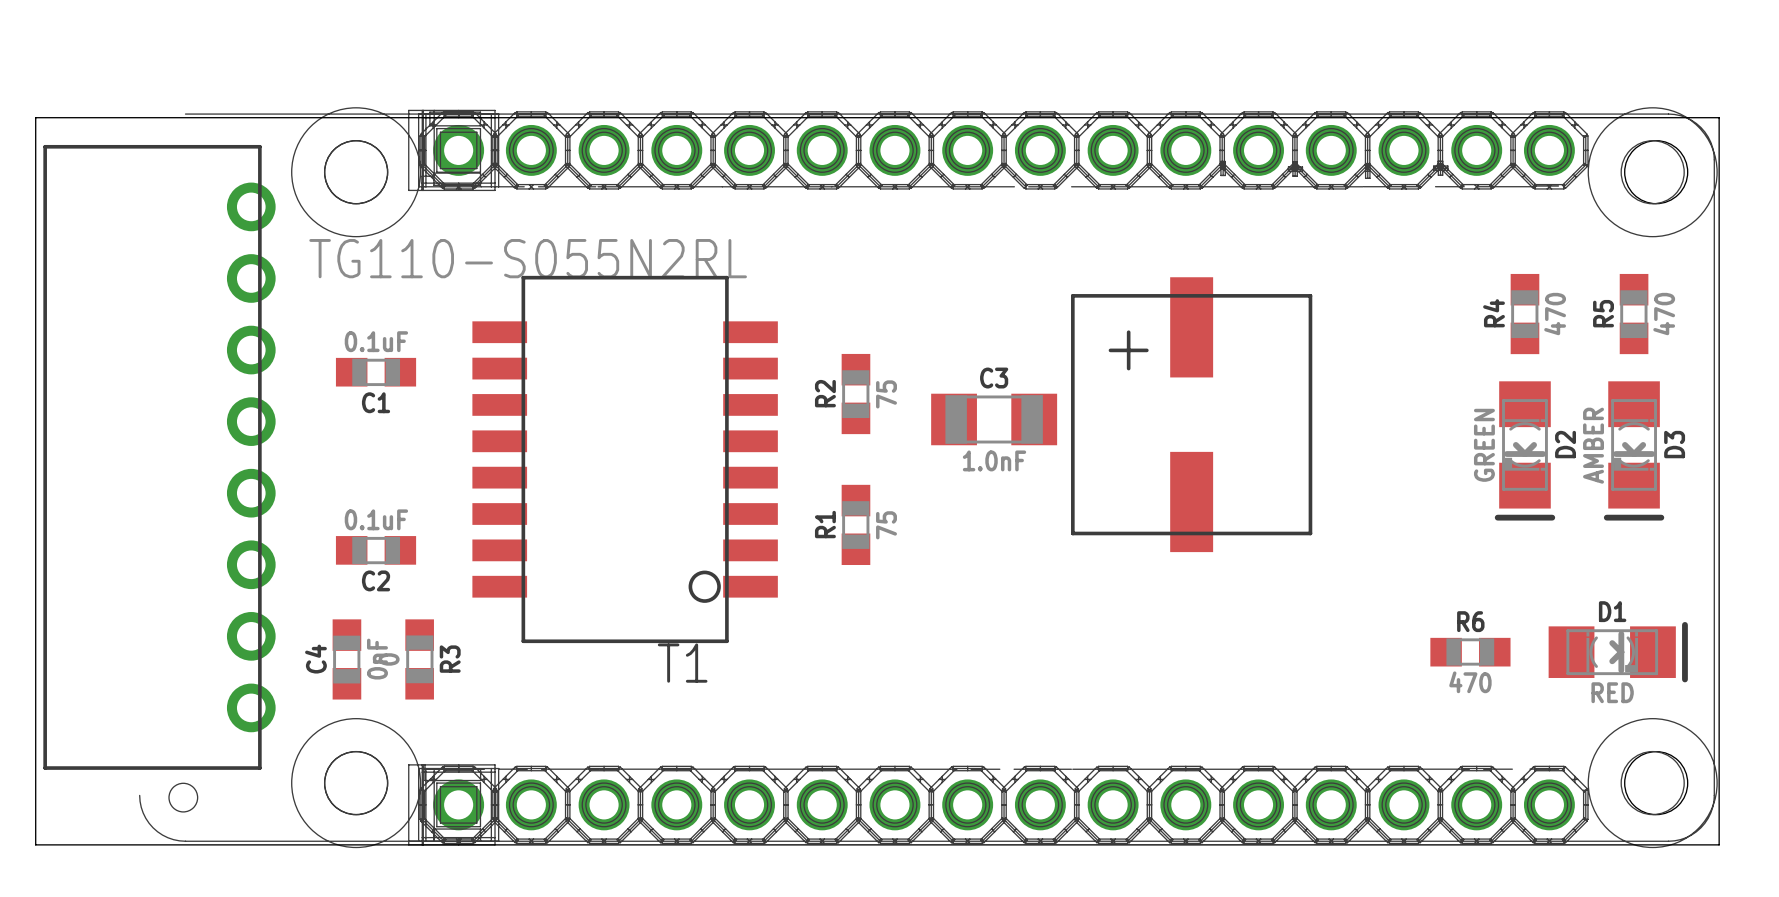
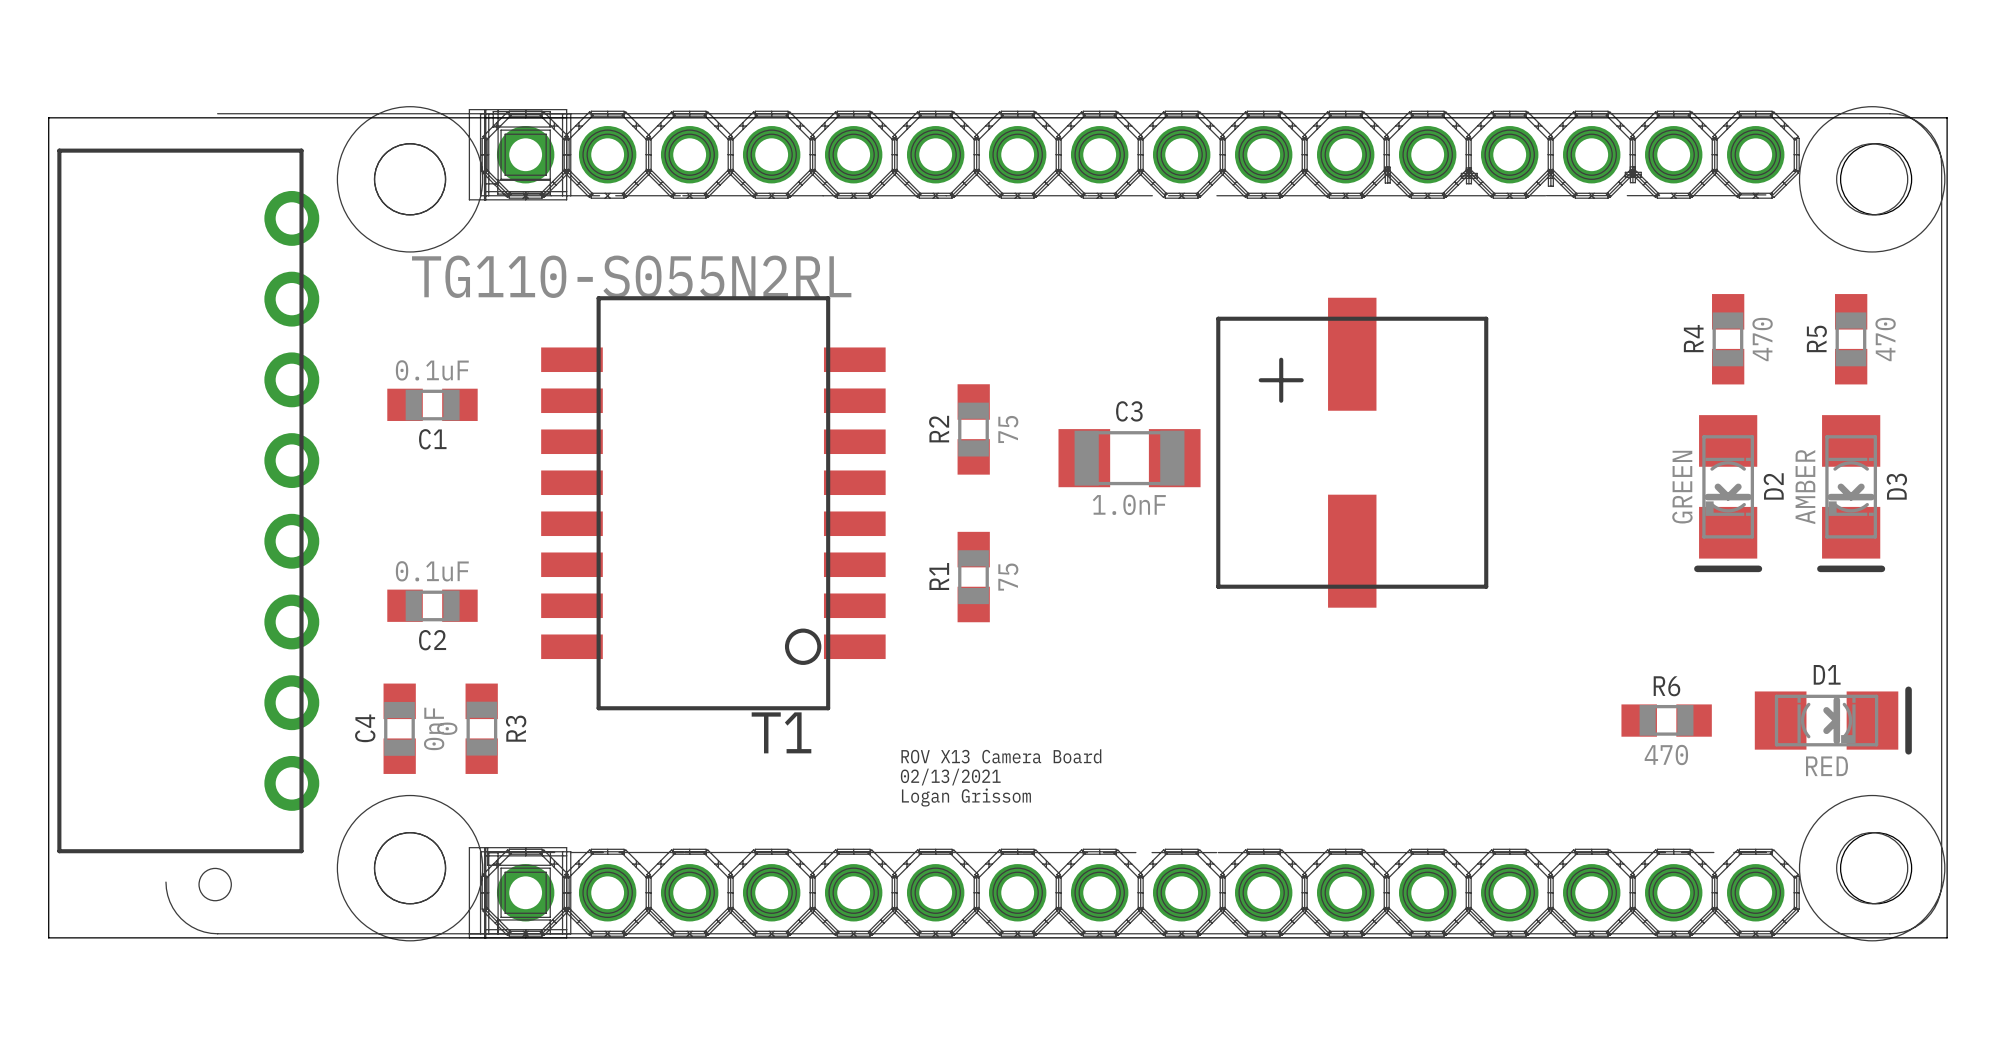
text: none -> ROV X13 Camera Board (1001, 756)
text: none -> 02/13/2021 (950, 777)
text: none -> Logan Grissom (966, 797)

